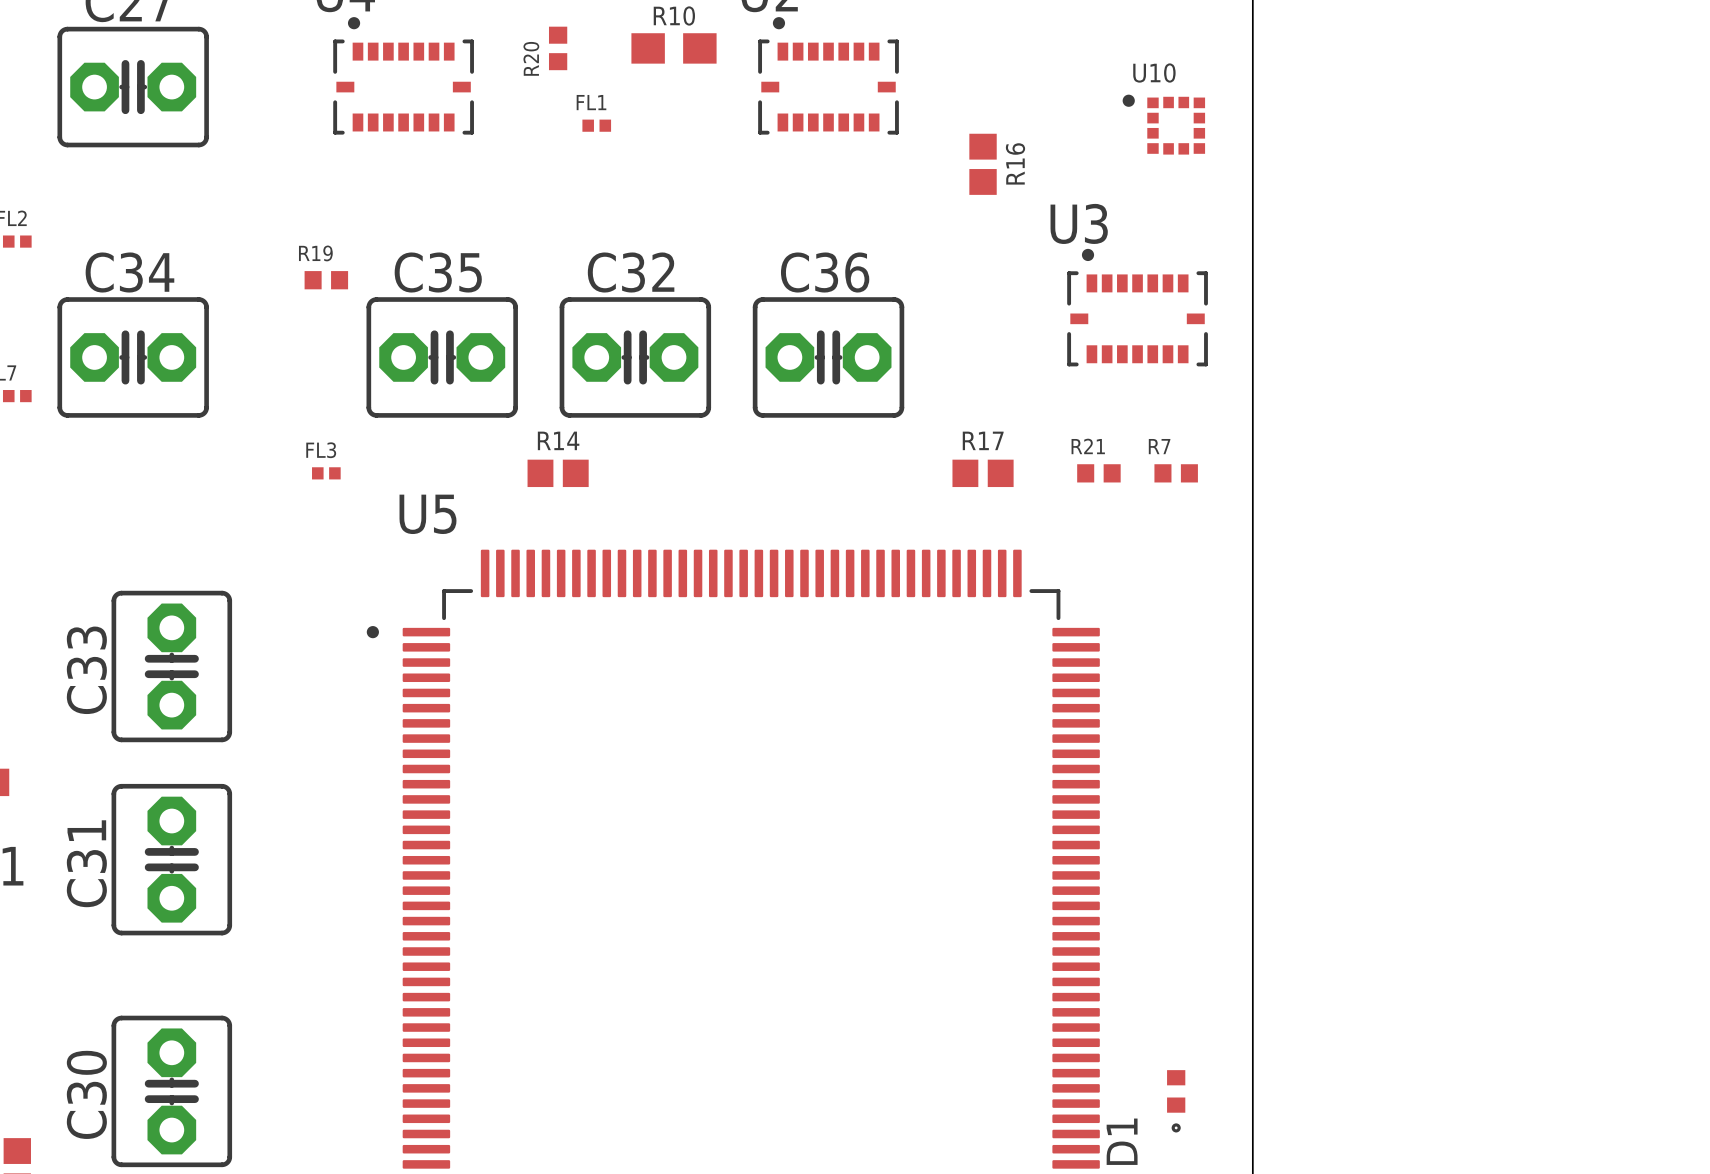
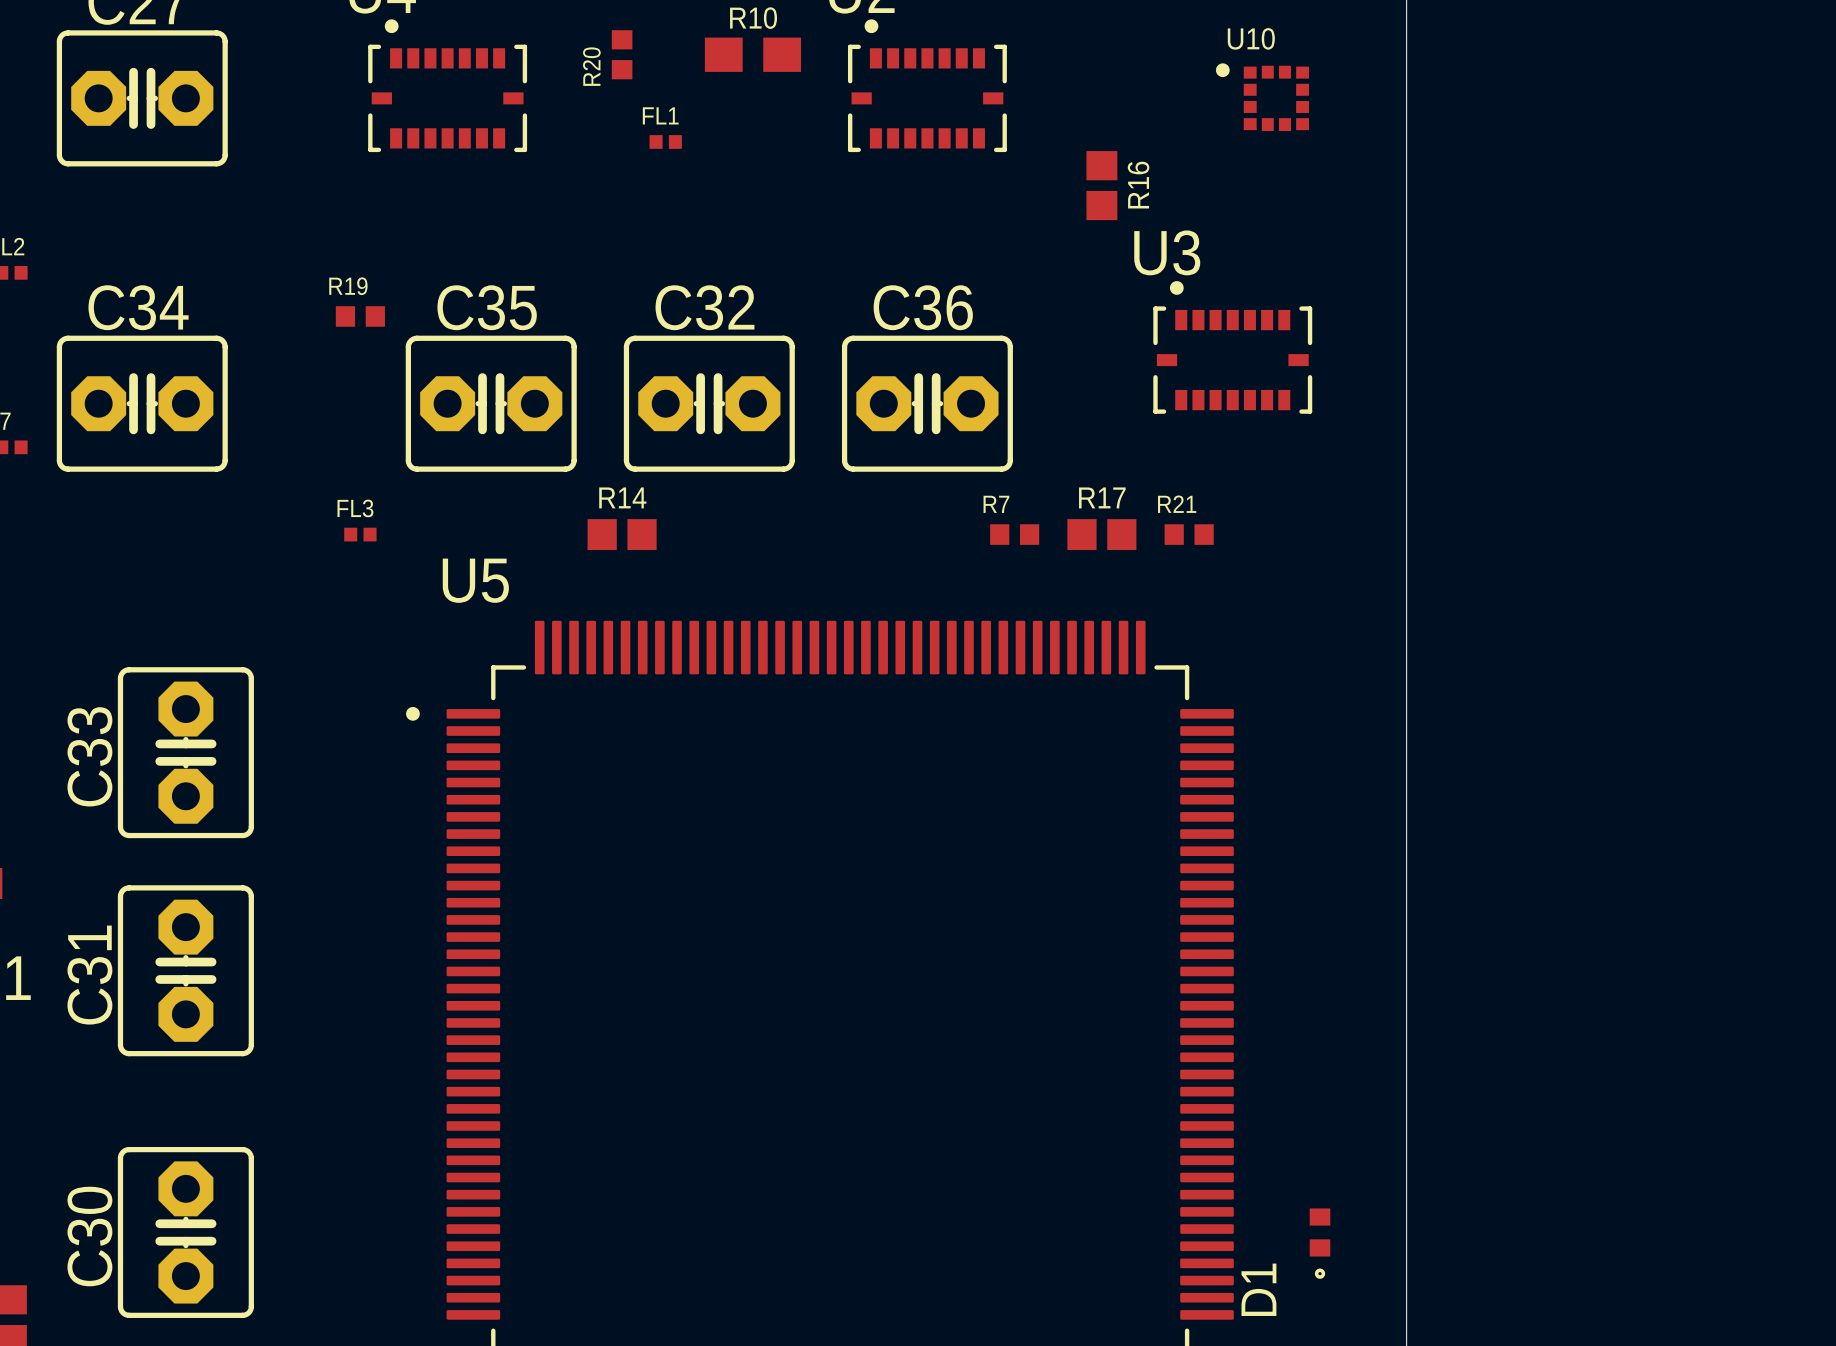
U10 position: (1163, 124) -> (1262, 97)
U3 position: (1137, 307) -> (1232, 347)
R21 position: (1098, 473) -> (1189, 534)
R7 position: (1176, 473) -> (1014, 534)

